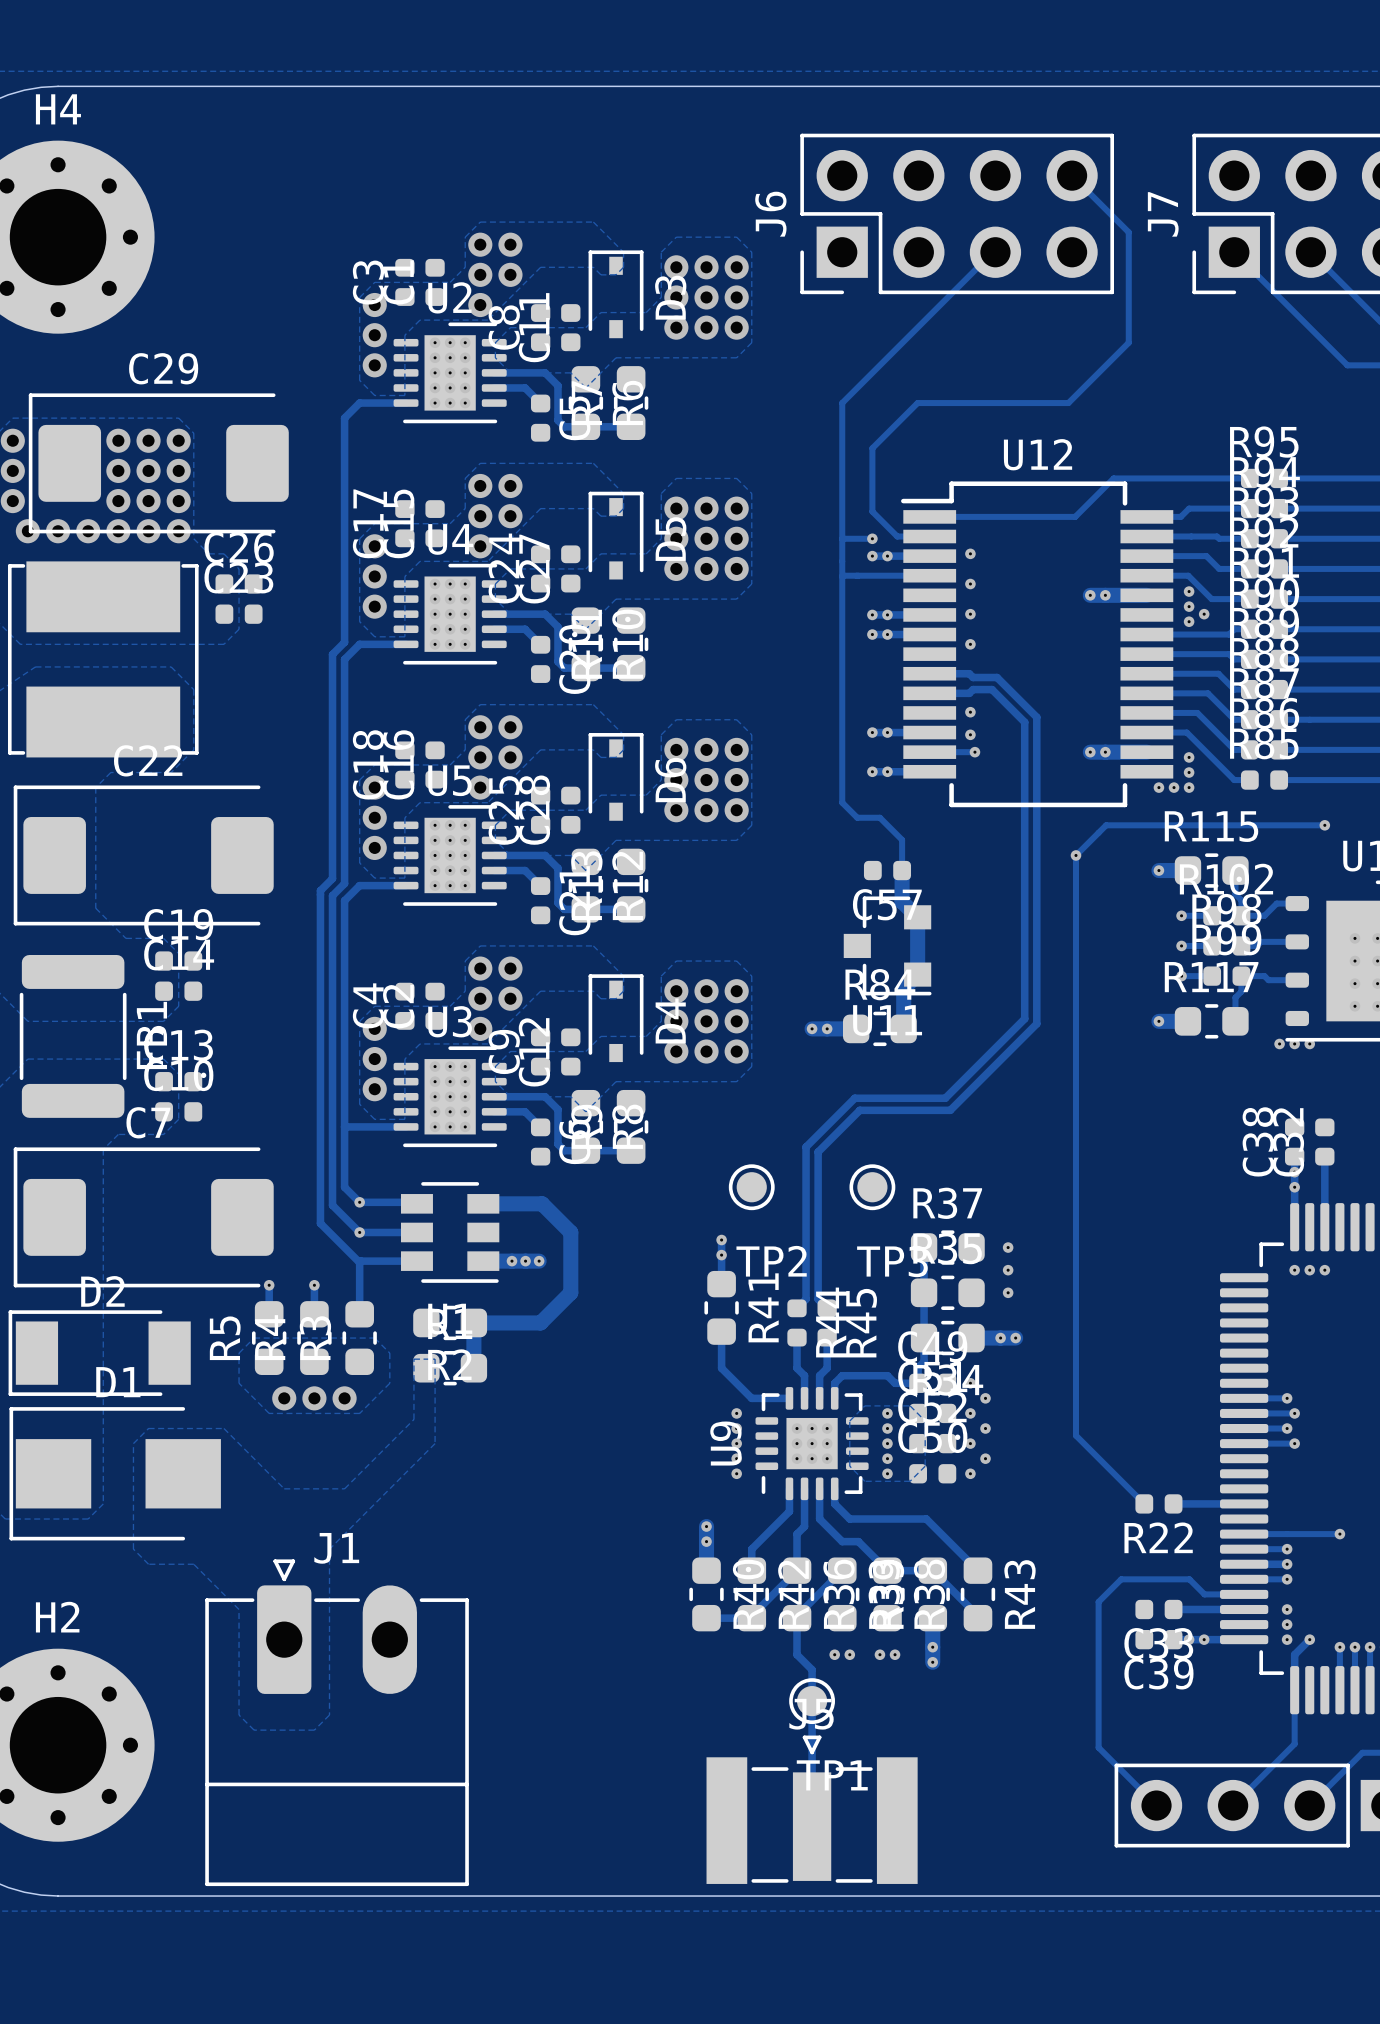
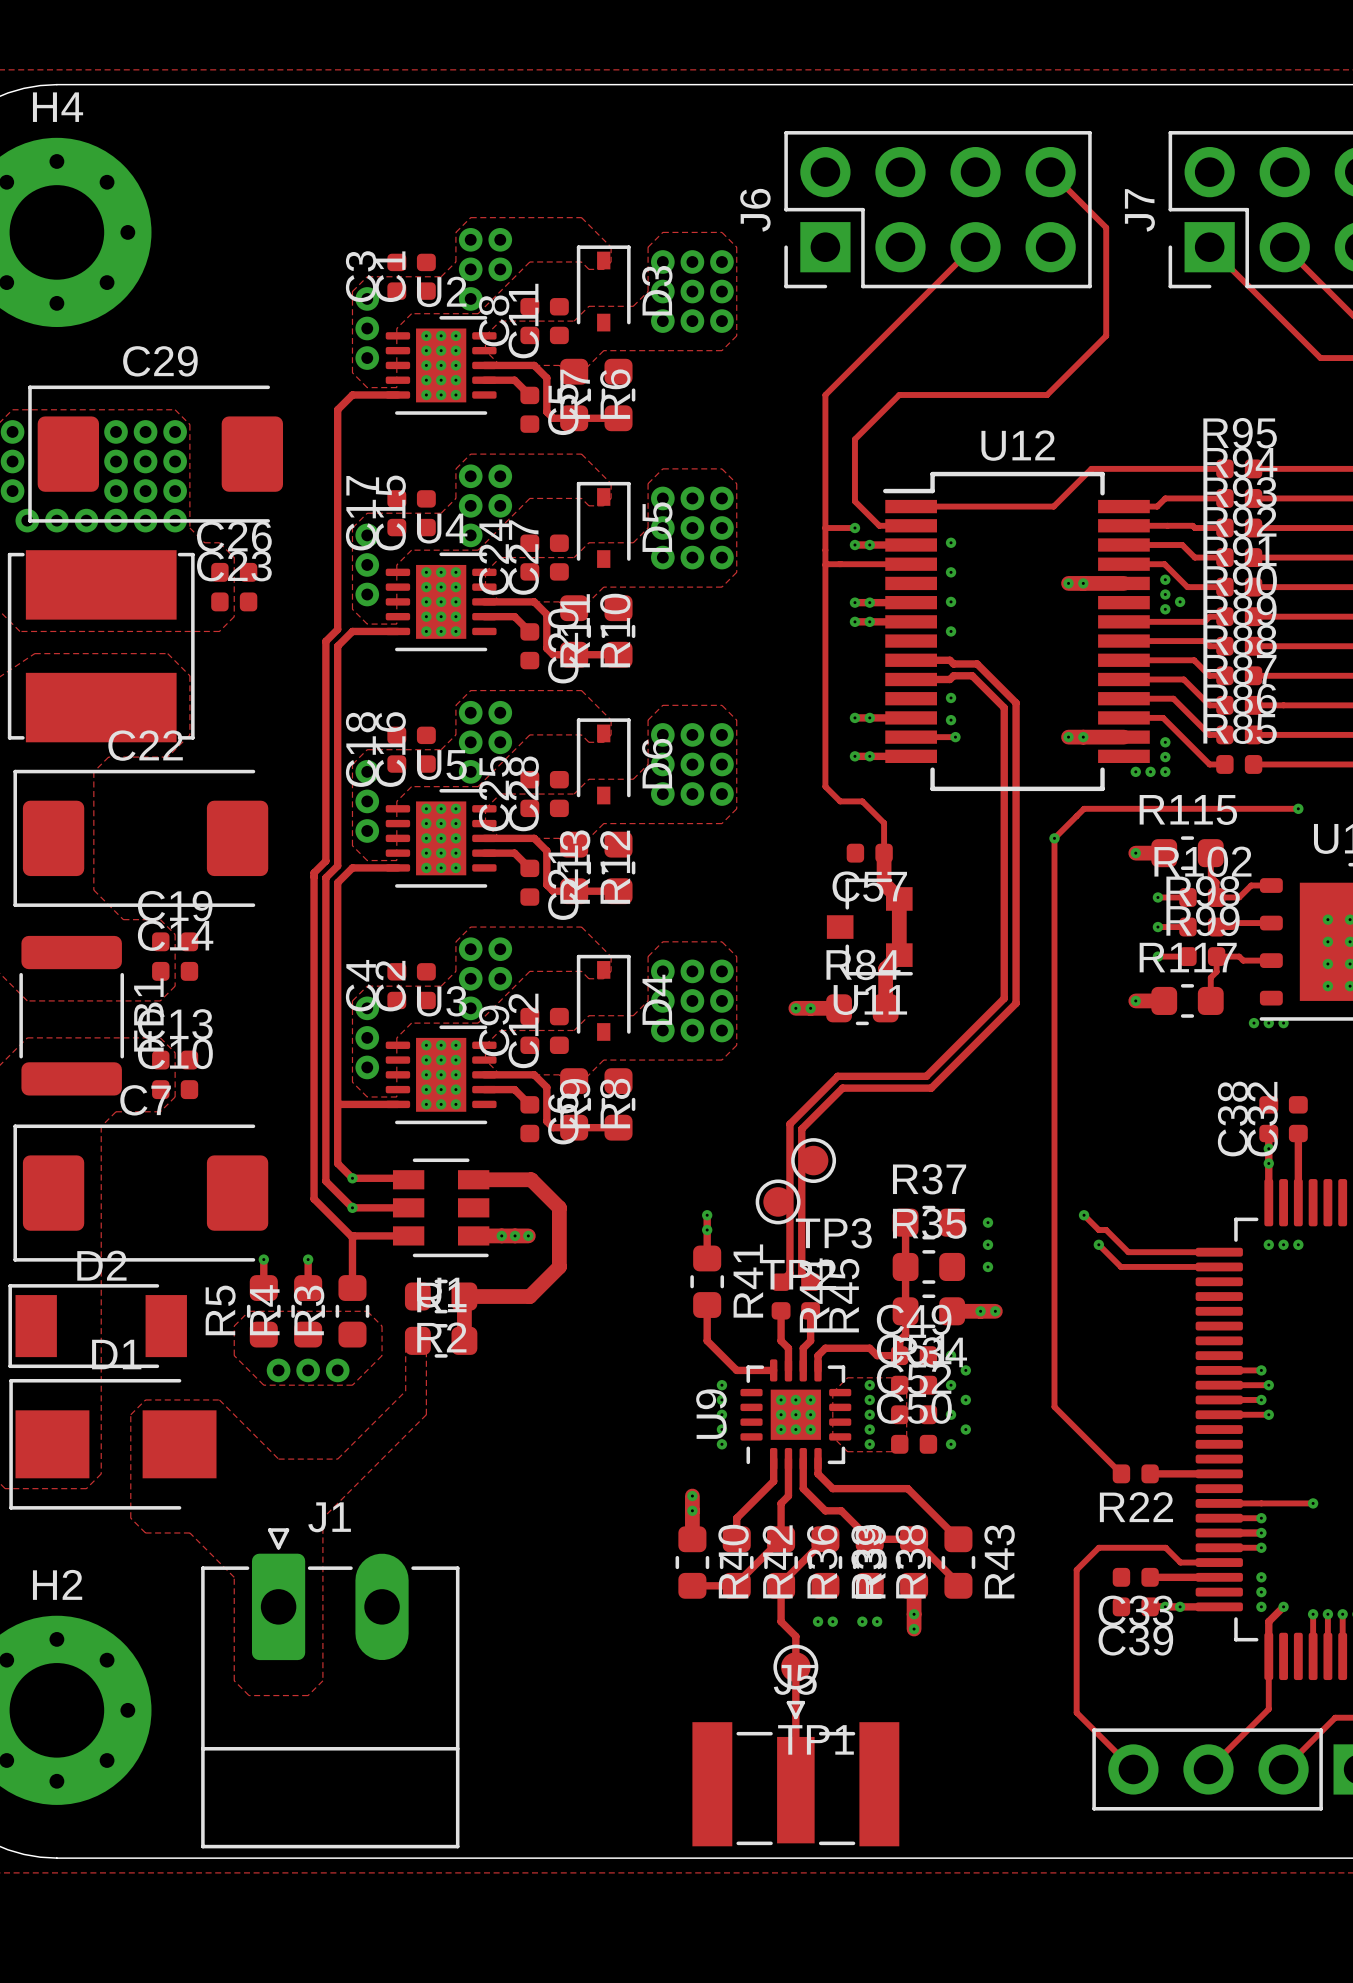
TP2 position: (751, 1187) -> (778, 1201)
TP3 position: (872, 1187) -> (813, 1160)
track: none -> (1084, 1215) (1098, 1230) (1106, 1230) (1128, 1252) (1219, 1252)
via: none -> (1084, 1215)
track: none -> (1098, 1244) (1120, 1266) (1219, 1266)
via: none -> (1098, 1244)

